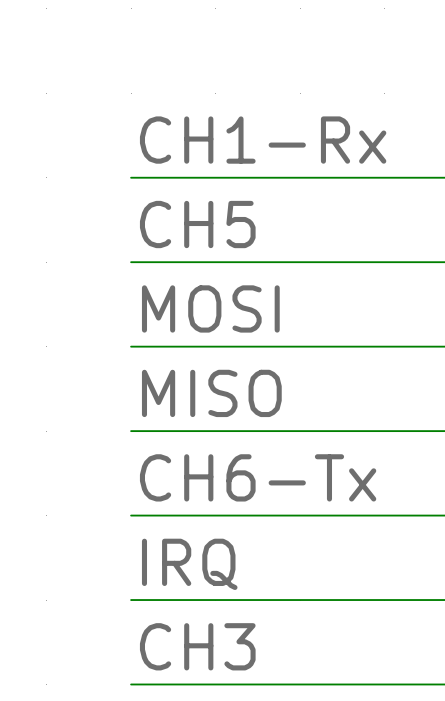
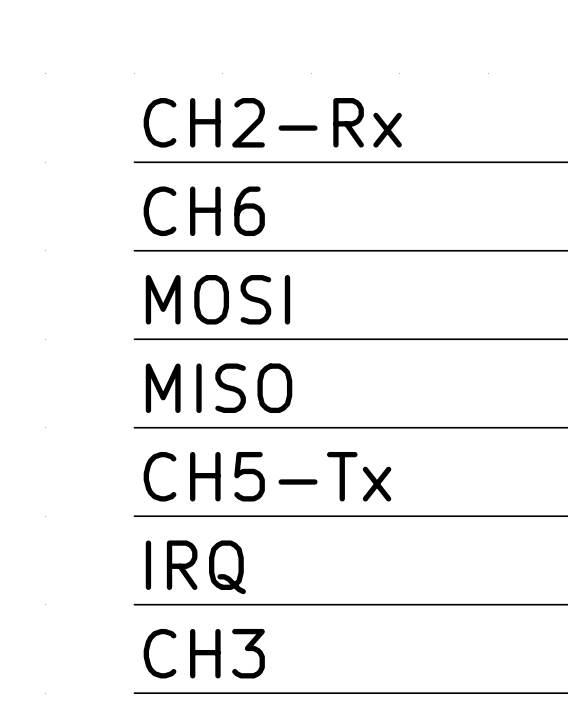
label: CH1-Rx (263, 140) -> CH2-Rx (272, 122)
label: CH5 (197, 224) -> CH6 (204, 211)
label: CH6-Tx (258, 477) -> CH5-Tx (267, 476)

